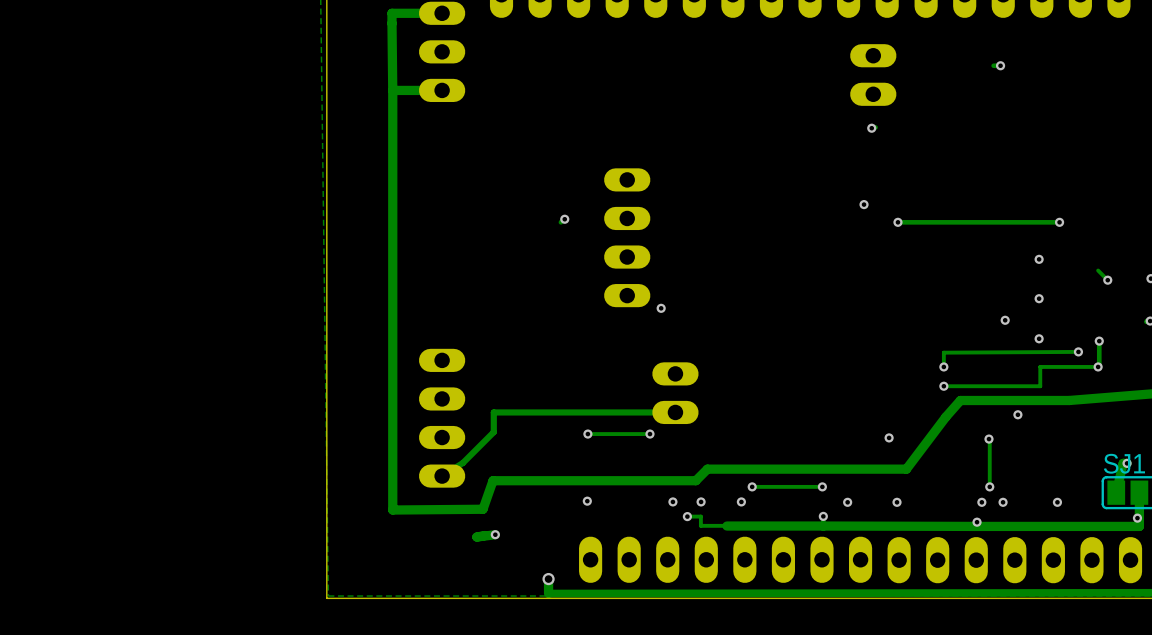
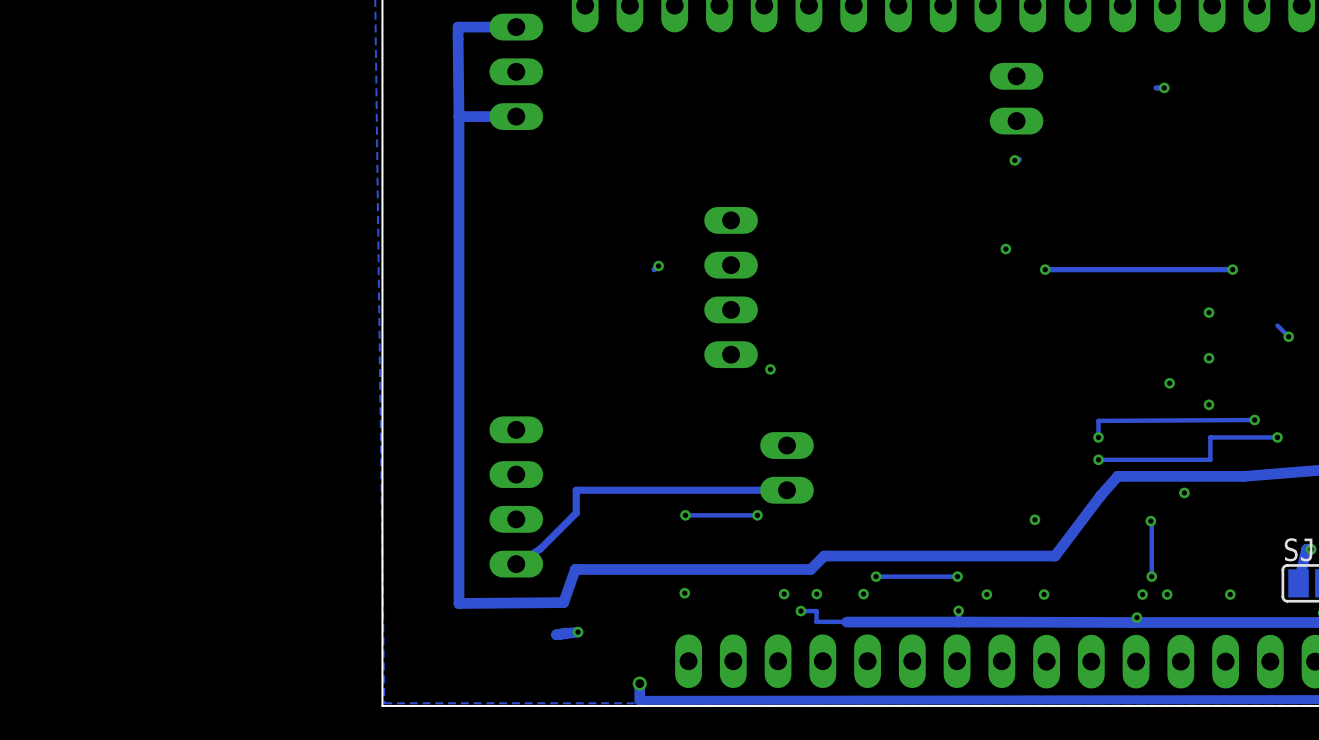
track: (1099, 341) (1098, 366) -> none
via: (1099, 341) -> none

